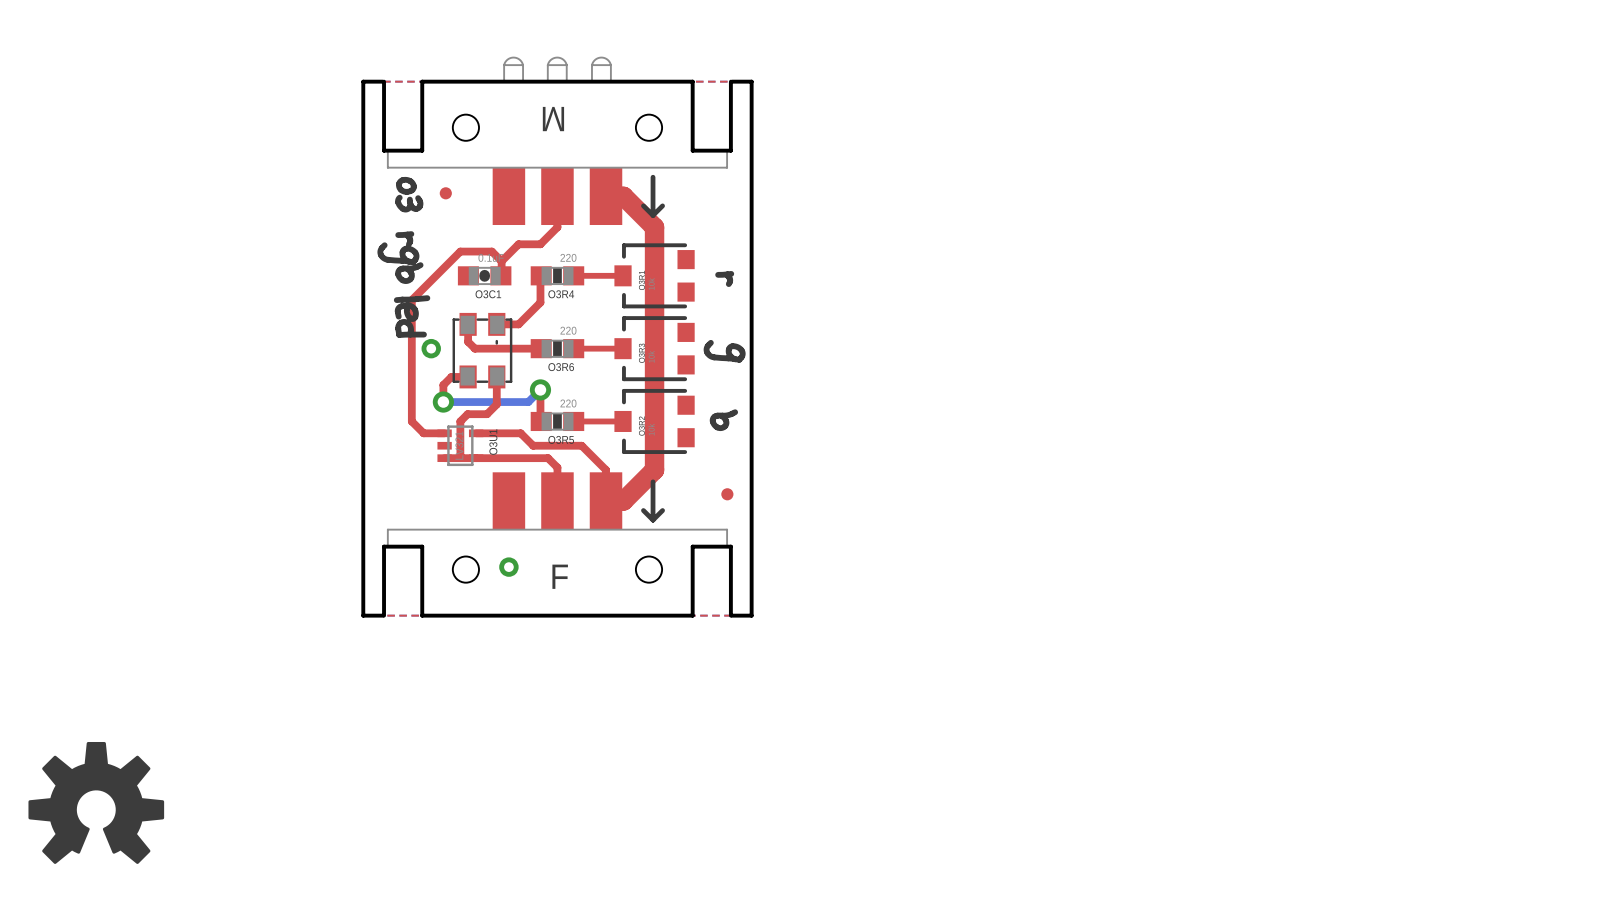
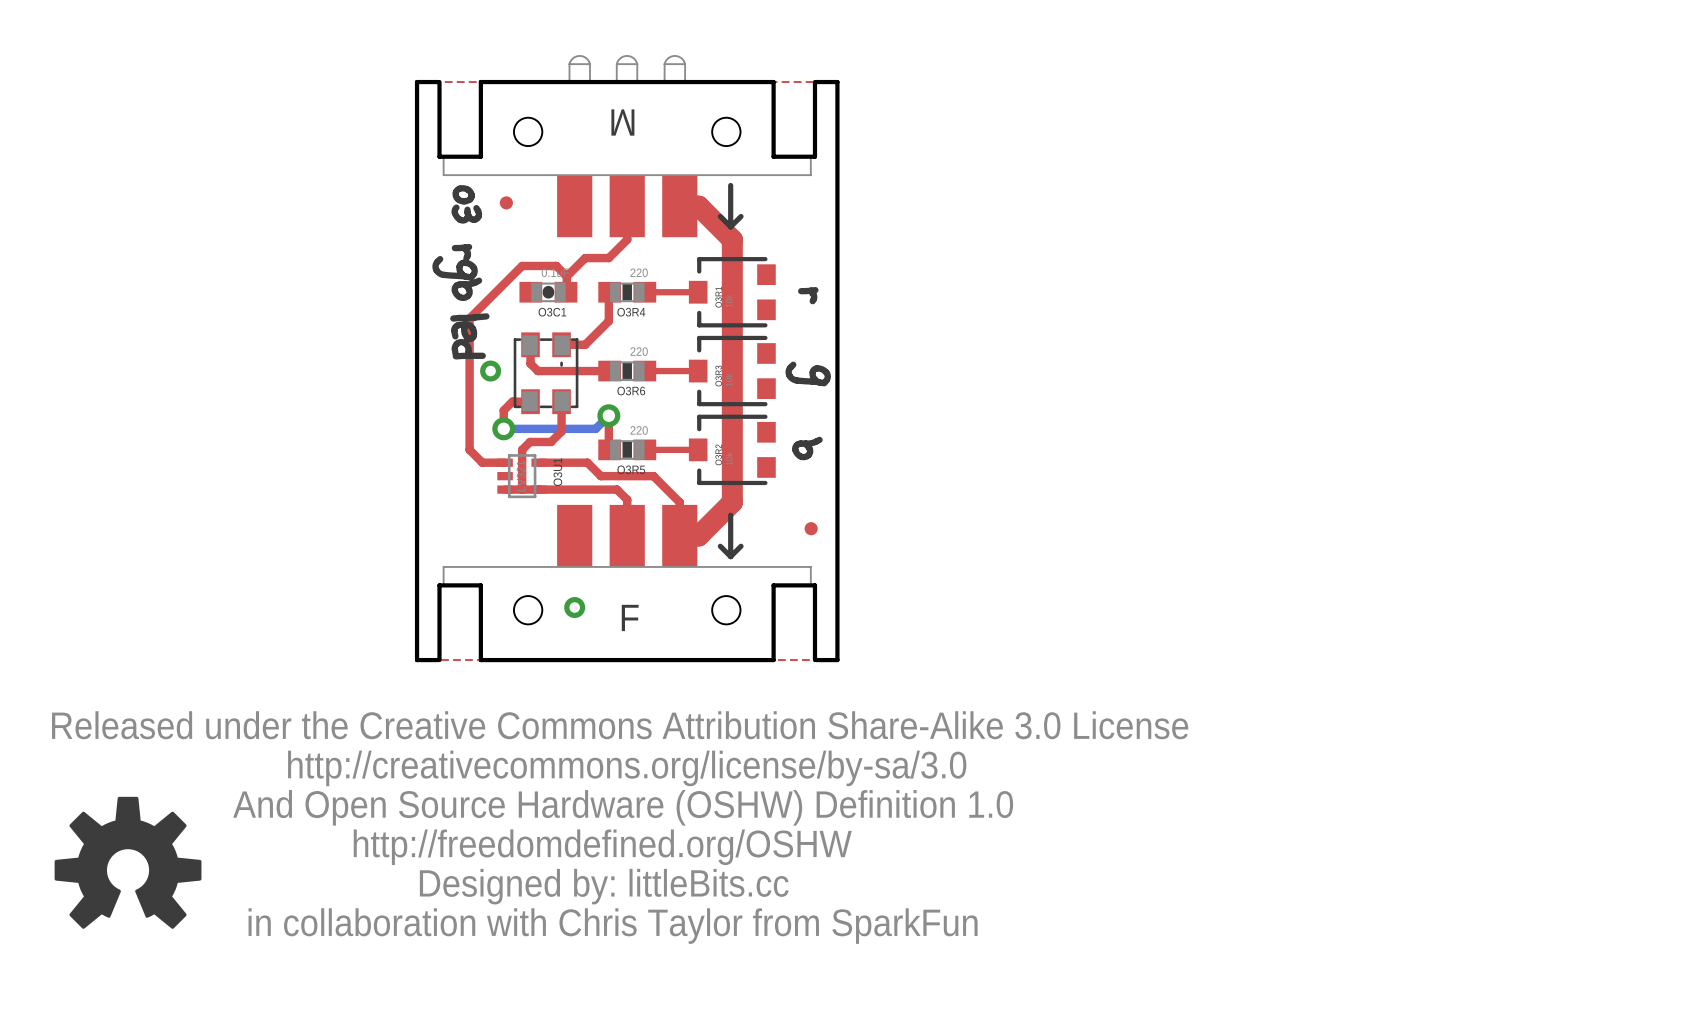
drawing: none -> [52, 711, 1189, 944]

